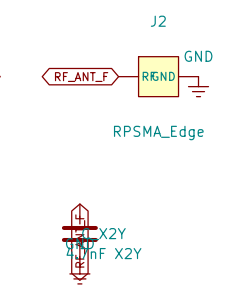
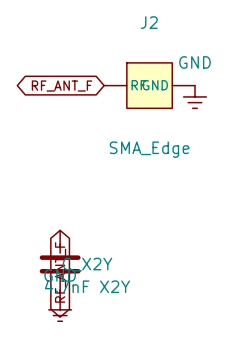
J2 value: RPSMA_Edge (158, 133) -> SMA_Edge (149, 149)

